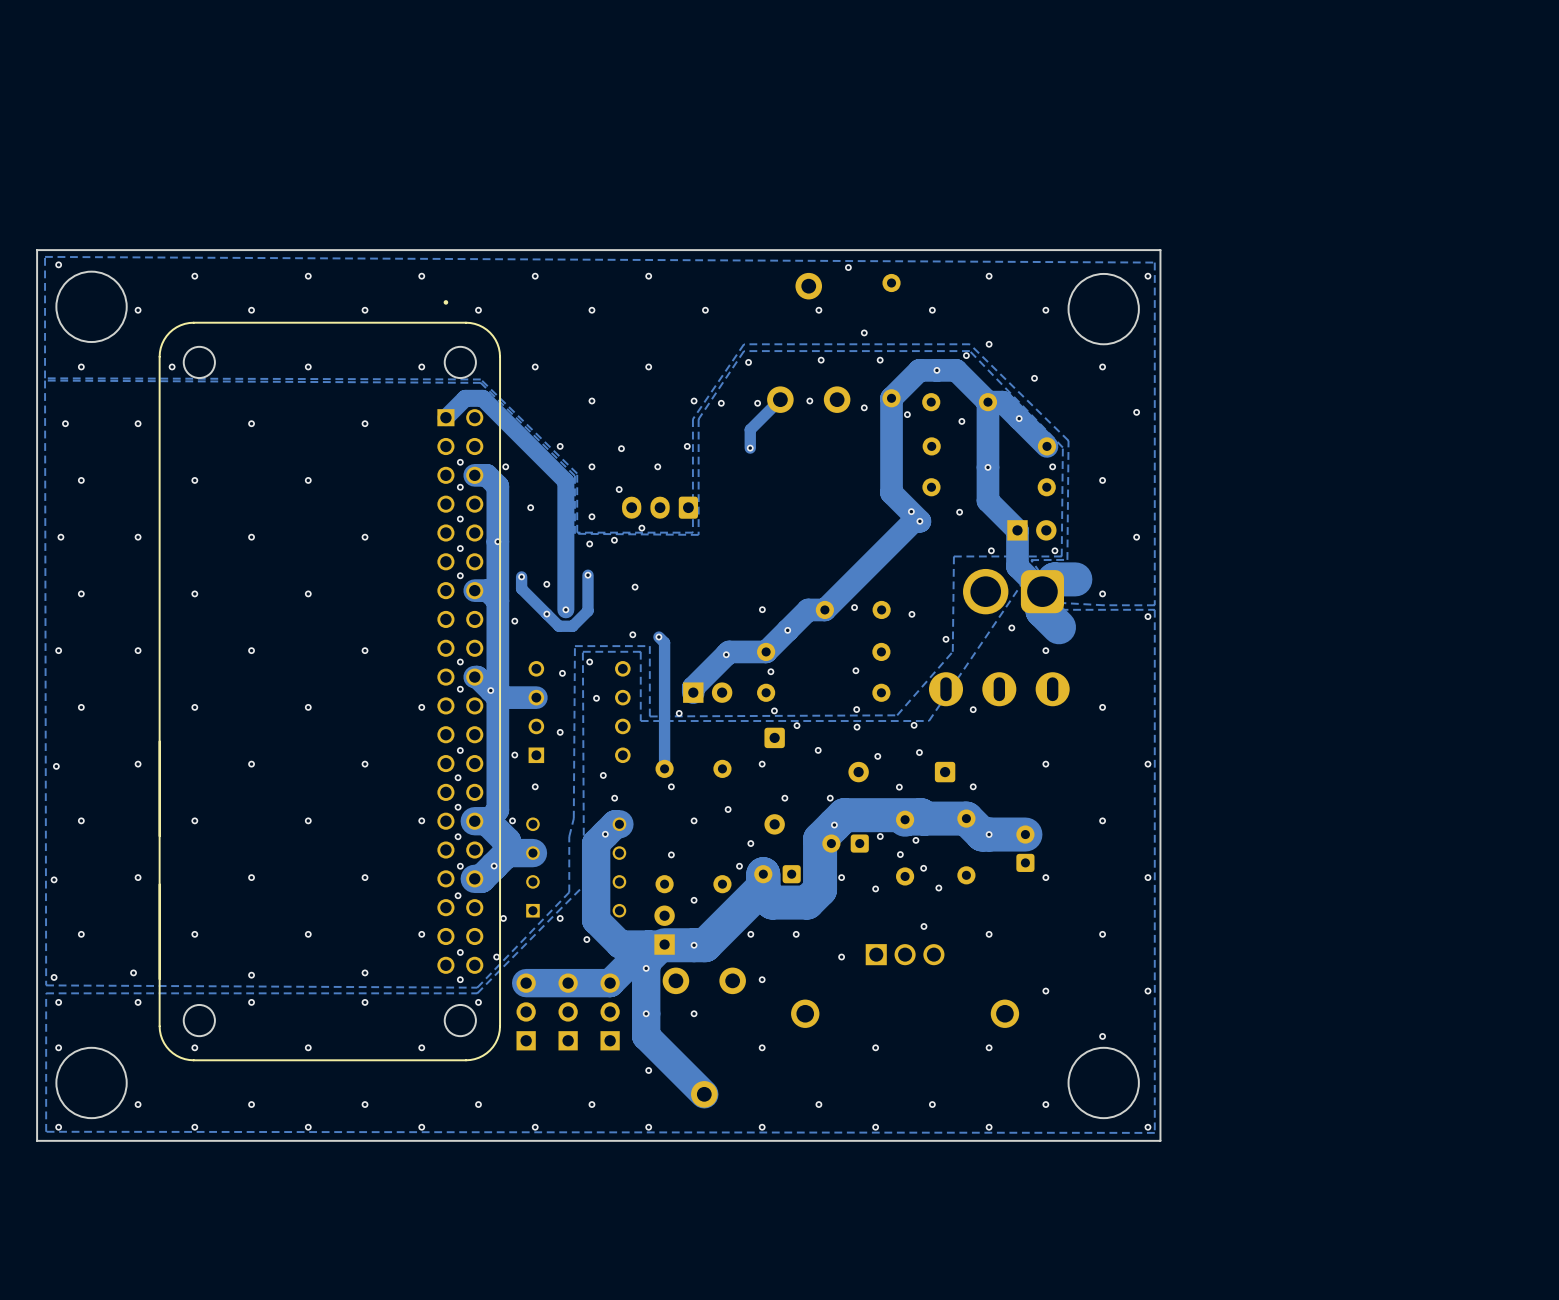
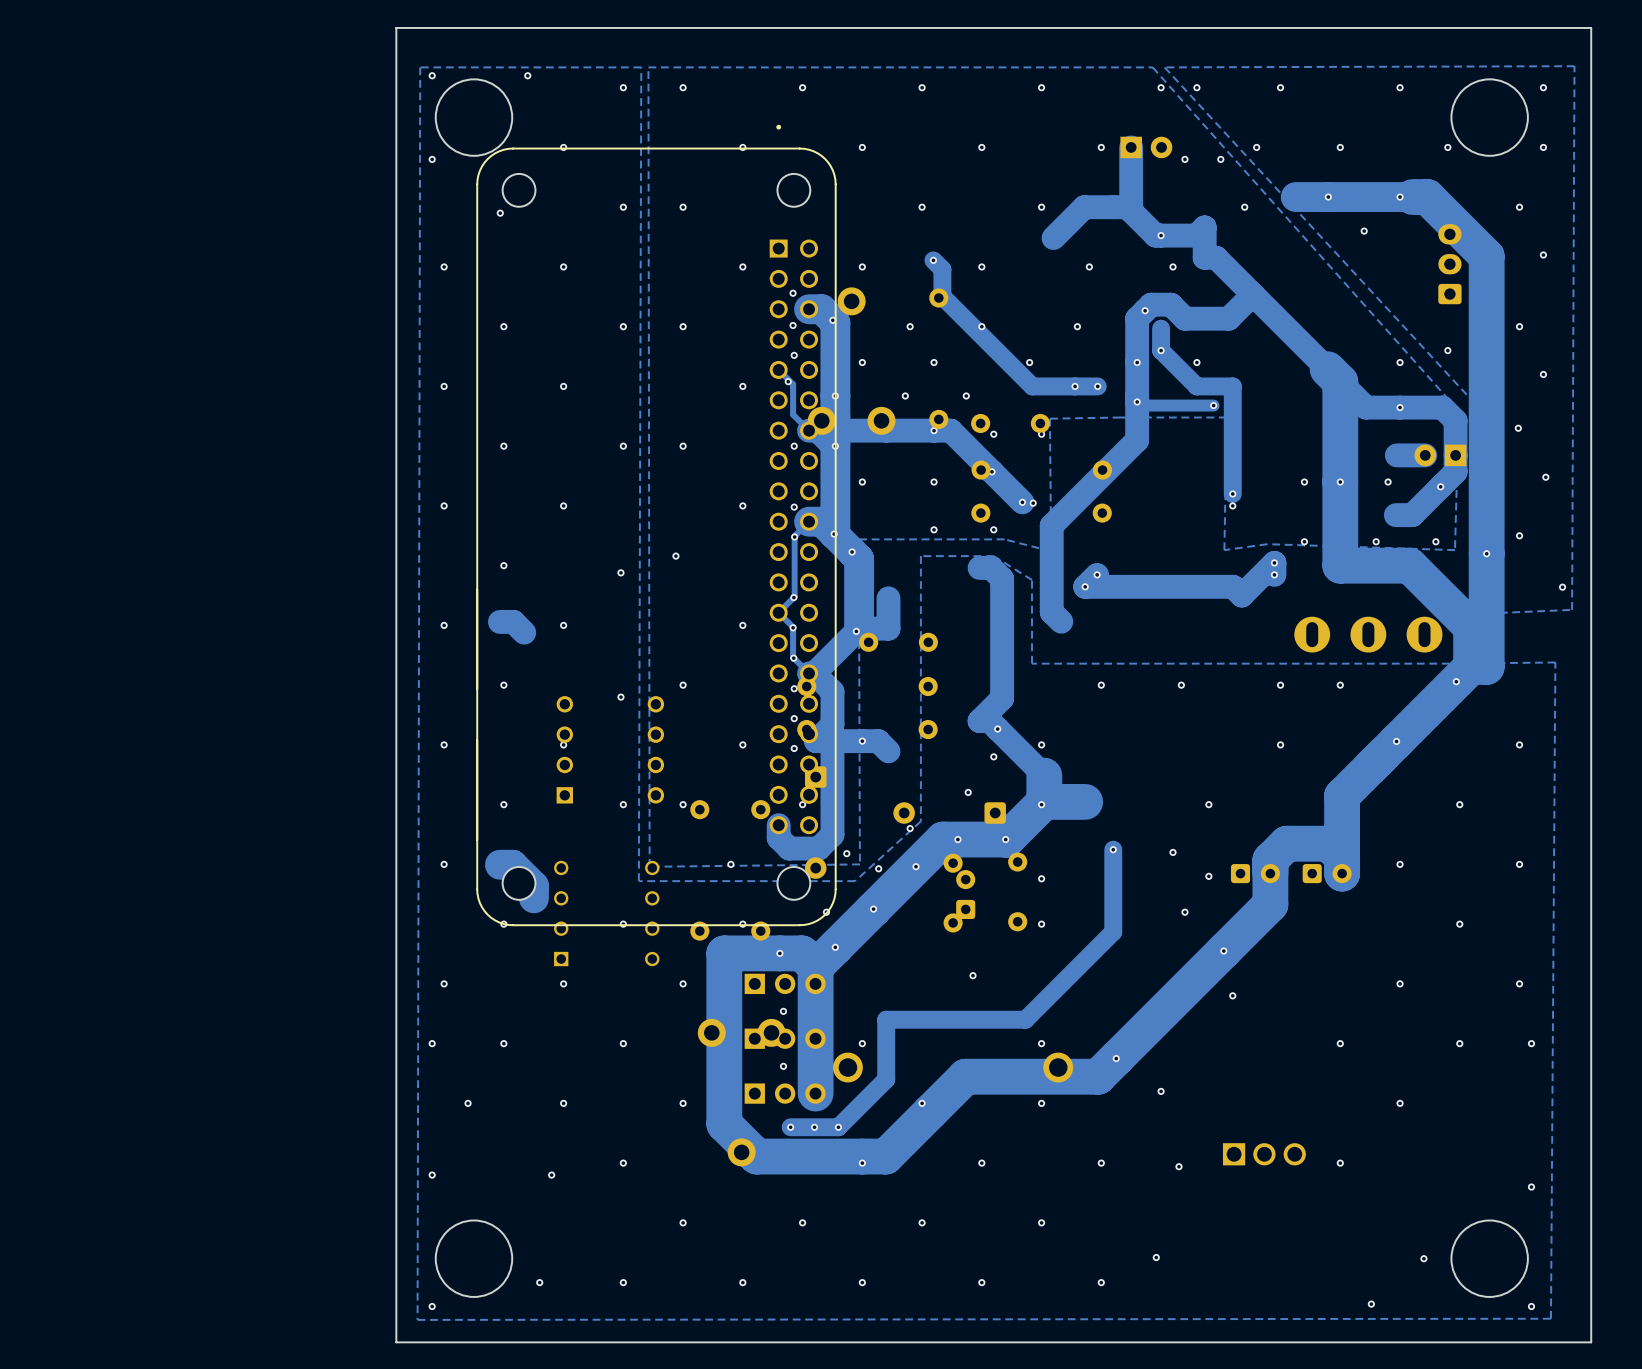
board edge: none -> (1591, 27) (396, 27) (396, 1342) (1591, 1342) (1591, 27)
zone outline: none -> (1574, 66) (1572, 609) (1487, 613) (1486, 416) (1164, 67) (1574, 66)
zone outline: none -> (1152, 67) (648, 67) (649, 866) (859, 864) (859, 628) (850, 539) (1004, 539) (1051, 551) (1049, 418) (1226, 417) (1224, 550) (1267, 544) (1455, 550) (1458, 415) (1445, 395) (1152, 67)
via: none -> (432, 75)
via: none -> (527, 75)
round board edge: none -> [435, 79, 513, 157]
round board edge: none -> [1451, 79, 1529, 157]
via: none -> (623, 87)
via: none -> (683, 87)
via: none -> (802, 87)
via: none -> (922, 87)
via: none -> (1041, 87)
via: none -> (1161, 87)
via: none -> (1196, 87)
via: none -> (1280, 87)
via: none -> (1400, 87)
via: none -> (1543, 87)
via: none -> (563, 147)
via: none -> (742, 147)
via: none -> (862, 147)
via: none -> (981, 147)
via: none -> (1101, 147)
track: none -> (1131, 147) (1131, 211) (1155, 235) (1196, 235) (1204, 227) (1204, 257) (1216, 257) (1365, 407) (1442, 407) (1455, 420) (1455, 471) (1412, 515) (1395, 515)
part: none -> (1146, 147)
via: none -> (1256, 147)
via: none -> (1340, 147)
via: none -> (1447, 147)
via: none -> (1543, 147)
via: none -> (432, 159)
via: none -> (1184, 159)
via: none -> (1220, 159)
track: none -> (1295, 197) (1427, 197) (1486, 256) (1486, 666) (1471, 666)
via: none -> (1328, 197)
via: none -> (1400, 197)
via: none -> (623, 207)
via: none -> (683, 207)
via: none -> (922, 207)
via: none -> (1041, 207)
track: none -> (1131, 207) (1084, 207) (1053, 238)
via: none -> (1244, 207)
via: none -> (1519, 207)
via: none -> (500, 213)
via: none -> (1364, 231)
via: none -> (1161, 235)
via: none -> (1543, 255)
track: none -> (933, 260) (942, 269) (942, 296) (1032, 386) (1097, 386)
via: none -> (933, 260)
board edge: (1160, 250) (37, 250) (37, 1140) (1160, 1140) (1160, 250) -> none
part: none -> (1449, 264)
via: none -> (742, 266)
via: none -> (862, 266)
via: none -> (981, 266)
via: none -> (1089, 266)
via: none -> (1173, 266)
zone outline: (45, 256) (45, 378) (480, 379) (577, 473) (577, 532) (692, 532) (692, 419) (744, 344) (969, 344) (1068, 440) (1067, 559) (1031, 560) (1061, 602) (1154, 605) (1154, 262) (45, 256) -> none
via: (58, 264) -> none
via: (848, 267) -> none
round board edge: [56, 271, 128, 343] -> none
round board edge: [1068, 273, 1140, 345] -> none
via: (194, 276) -> none
via: (308, 276) -> none
via position: (421, 276) -> (444, 266)
via position: (535, 276) -> (563, 266)
via: (648, 276) -> none
via: (989, 276) -> none
via: (1147, 276) -> none
via: none -> (793, 293)
track: none -> (1252, 294) (1228, 318) (1184, 318) (1170, 304) (1151, 304) (1137, 318) (1137, 440) (1051, 525) (1051, 612) (1061, 621)
track: none -> (809, 309) (821, 309) (835, 322) (835, 417) (821, 430) (835, 444) (834, 534)
via: none -> (1145, 310)
via: none -> (832, 320)
via: none -> (793, 325)
via: (138, 310) -> none
via: (251, 310) -> none
via: (365, 310) -> none
via: none -> (683, 326)
via: (705, 310) -> none
via: (818, 310) -> none
via: none -> (910, 326)
via: none -> (1077, 326)
via: (1045, 310) -> none
via: none -> (1519, 326)
track: none -> (1161, 328) (1161, 350) (1196, 386) (1232, 386) (1232, 493)
via: (864, 332) -> none
via: none -> (1161, 350)
via: none -> (1447, 350)
via: none -> (794, 355)
via: none -> (862, 362)
via: none -> (934, 362)
via: none -> (1029, 362)
via: (989, 344) -> none
via: none -> (1137, 362)
via: none -> (1196, 362)
via: none -> (1400, 362)
track: none -> (1327, 369) (1340, 381) (1340, 565) (1409, 565) (1471, 627) (1471, 666)
track: none -> (778, 369) (793, 384) (793, 414) (809, 430) (950, 430) (1022, 502)
zone outline: (969, 351) (1062, 447) (1061, 556) (953, 556) (952, 651) (897, 715) (649, 716) (649, 646) (574, 646) (573, 818) (569, 836) (569, 892) (477, 987) (46, 985) (45, 380) (480, 382) (574, 475) (574, 533) (698, 534) (698, 419) (744, 351) (969, 351) -> none
via: (966, 355) -> none
via: none -> (1543, 374)
via: (821, 360) -> none
via: (880, 360) -> none
via: (81, 366) -> none
via: (172, 366) -> none
via: (308, 366) -> none
via: (648, 366) -> none
via: none -> (742, 386)
via: none -> (1075, 386)
via: none -> (1097, 386)
via: (1102, 366) -> none
via: (936, 370) -> none
via: none -> (835, 395)
via: none -> (905, 395)
via: none -> (966, 395)
track: none -> (1137, 395) (1146, 405) (1213, 405)
via: (1034, 378) -> none
via: none -> (1137, 401)
via: none -> (1213, 405)
via: none -> (1400, 407)
track: (780, 399) (750, 429) (750, 448) -> none
via: (591, 401) -> none
via: (694, 401) -> none
via: (809, 401) -> none
track: (987, 402) (987, 500) (1017, 530) (1017, 566) (1042, 591) -> none
track: (987, 402) (1002, 402) (1046, 446) -> none
track: (987, 402) (956, 370) (919, 370) (891, 398) (891, 492) (919, 521) (913, 521) (824, 609) (808, 609) (766, 651) (729, 651) (693, 687) (693, 692) -> none
via: (721, 403) -> none
via: (757, 403) -> none
via: none -> (1518, 428)
via: (864, 407) -> none
via: none -> (934, 430)
via: none -> (993, 434)
via: none -> (1041, 434)
via: (1136, 412) -> none
via: (907, 414) -> none
track: (445, 417) (465, 398) (482, 398) (565, 481) (565, 609) -> none
via: (1019, 418) -> none
via: (961, 421) -> none
via: (65, 423) -> none
via: (138, 423) -> none
via: (251, 423) -> none
via: (365, 423) -> none
via: none -> (503, 446)
via: none -> (623, 446)
via: none -> (683, 446)
via: none -> (794, 446)
via: none -> (835, 446)
track: none -> (1425, 455) (1396, 455)
part: none -> (1440, 455)
via: (560, 446) -> none
via: (687, 446) -> none
via: (621, 448) -> none
via: (750, 448) -> none
via: none -> (991, 471)
via: none -> (1545, 477)
via: none -> (862, 482)
via: none -> (934, 482)
via: none -> (1304, 482)
via: none -> (1340, 482)
via: none -> (1388, 482)
via: (460, 462) -> none
via: none -> (1440, 486)
via: (505, 466) -> none
via: (591, 466) -> none
via: (657, 466) -> none
via: (1052, 466) -> none
via: (987, 467) -> none
via: none -> (1232, 493)
track: (474, 475) (486, 475) (497, 486) (497, 810) (486, 821) -> none
via: none -> (1022, 502)
via: none -> (1033, 503)
via: (81, 480) -> none
via: (194, 480) -> none
via: (308, 480) -> none
via: none -> (444, 505)
via: none -> (563, 505)
via: none -> (742, 505)
via: (1102, 480) -> none
via: none -> (1232, 505)
via: none -> (794, 507)
via: (460, 487) -> none
via: (619, 489) -> none
part: none -> (656, 525)
via: none -> (934, 529)
via: none -> (993, 529)
via: (530, 507) -> none
part: (660, 507) -> none
via: none -> (834, 534)
via: none -> (1519, 535)
via: none -> (794, 536)
via: (911, 511) -> none
via: (959, 512) -> none
via: none -> (1304, 541)
via: none -> (1376, 541)
via: none -> (1435, 541)
via: (591, 516) -> none
via: (460, 519) -> none
via: (919, 521) -> none
via: none -> (852, 552)
via: none -> (1486, 553)
part: (1031, 530) -> none
via: none -> (1274, 562)
via: (60, 537) -> none
via: (138, 537) -> none
via: (251, 537) -> none
via: (365, 537) -> none
via: none -> (503, 565)
via: (1136, 537) -> none
track: none -> (979, 567) (991, 567) (1002, 578) (1002, 698) (979, 721) (989, 721) (1044, 775) (1044, 801)
via: (614, 540) -> none
via: (497, 541) -> none
via: none -> (1097, 574)
track: none -> (1274, 574) (1274, 562) (1241, 595) (1233, 586) (1085, 586) (1097, 574)
via: none -> (1274, 574)
via: (460, 548) -> none
via: (991, 550) -> none
via: (1054, 550) -> none
via: none -> (1085, 586)
via: none -> (1562, 587)
via: none -> (793, 597)
track: none -> (888, 598) (888, 628) (859, 628)
via: (460, 575) -> none
track: (587, 575) (587, 610) (572, 626) (559, 626) (521, 588) (521, 576) -> none
via: (587, 575) -> none
via: (521, 576) -> none
track: (1075, 579) (1054, 579) (1042, 591) -> none
zone outline: (1022, 583) (928, 721) (640, 721) (640, 651) (582, 651) (584, 885) (477, 993) (46, 993) (46, 1131) (1154, 1132) (1154, 609) (1060, 609) (1022, 583) -> none
via: (546, 584) -> none
via: (635, 587) -> none
part: (1013, 591) -> none
track: (1042, 591) (1042, 610) (1059, 627) -> none
via: (81, 593) -> none
via: (194, 593) -> none
via: (308, 593) -> none
via: none -> (444, 625)
via: none -> (563, 625)
via: none -> (742, 625)
via: (1102, 593) -> none
via: none -> (793, 627)
track: none -> (859, 628) (814, 673)
track: none -> (859, 628) (859, 559) (821, 521) (809, 521) (794, 536) (794, 596) (778, 612) (793, 627) (793, 657) (809, 673) (814, 673)
via: none -> (856, 631)
part: none -> (1368, 634)
via: (854, 607) -> none
via: (565, 609) -> none
via: (762, 609) -> none
via: (546, 614) -> none
via: (911, 614) -> none
via: (1147, 616) -> none
via: (514, 621) -> none
via: none -> (793, 658)
via: (1011, 627) -> none
via: (787, 630) -> none
zone outline: none -> (1462, 663) (1032, 663) (1032, 580) (993, 556) (920, 556) (920, 821) (855, 881) (638, 881) (641, 67) (420, 67) (417, 1319) (1550, 1318) (1555, 662) (1452, 663)
track: none -> (1471, 666) (1342, 795) (1342, 873)
via: (632, 634) -> none
track: (658, 637) (664, 642) (664, 768) -> none
via: (658, 637) -> none
track: none -> (814, 673) (832, 691) (832, 724) (816, 741) (878, 741) (888, 751)
via: (945, 639) -> none
via: none -> (1456, 681)
via: (58, 650) -> none
via: (138, 650) -> none
via: (251, 650) -> none
via: (365, 650) -> none
via: none -> (503, 685)
via: none -> (683, 685)
via: none -> (1181, 685)
via: none -> (1280, 685)
via: none -> (1340, 685)
via: (726, 654) -> none
via: none -> (794, 688)
via: (460, 662) -> none
via: (855, 670) -> none
via: (770, 671) -> none
via: (562, 673) -> none
track: (474, 677) (477, 677) (497, 697) (536, 697) -> none
part: (329, 680) -> none
via: none -> (794, 718)
via: (460, 689) -> none
part: (999, 689) -> none
via: (490, 690) -> none
part: (707, 692) -> none
via: none -> (997, 729)
via: (596, 698) -> none
track: none -> (832, 741) (832, 834) (818, 848) (789, 848) (778, 837) (778, 825)
via: none -> (862, 741)
via: none -> (1396, 741)
via: (81, 707) -> none
via: (194, 707) -> none
via: (308, 707) -> none
via: none -> (563, 744)
via: none -> (1041, 744)
via: (1102, 707) -> none
via: none -> (1280, 744)
via: none -> (1519, 744)
via: (856, 709) -> none
via: (973, 709) -> none
via: none -> (794, 748)
via: (774, 710) -> none
via position: (679, 713) -> (742, 744)
via: none -> (993, 756)
via: (797, 725) -> none
via: (914, 725) -> none
via: (857, 727) -> none
via: (560, 732) -> none
via: (460, 750) -> none
via: (818, 750) -> none
via: (514, 755) -> none
via: (877, 756) -> none
track: none -> (1044, 801) (1006, 839) (943, 839) (815, 967)
track: none -> (1085, 801) (1044, 801)
via: (138, 764) -> none
via: (251, 764) -> none
via: (365, 764) -> none
via: none -> (503, 804)
via: none -> (683, 804)
via: none -> (1041, 804)
via: (1045, 764) -> none
via: none -> (1459, 804)
via: (56, 766) -> none
via position: (603, 775) -> (623, 804)
via: (458, 777) -> none
via: (535, 786) -> none
via: (671, 786) -> none
via: none -> (910, 828)
via: (973, 786) -> none
via position: (899, 787) -> (957, 839)
via: none -> (1005, 839)
via: (614, 798) -> none
via: (784, 798) -> none
via: (830, 798) -> none
track: none -> (1113, 849) (1113, 932) (1025, 1019) (886, 1019) (886, 1079) (838, 1127) (790, 1127)
via: none -> (1113, 849)
via: (458, 807) -> none
via: (728, 809) -> none
via: none -> (846, 853)
track: none -> (1342, 857) (1328, 843) (1286, 843) (1270, 860) (1270, 904) (1098, 1076) (965, 1076) (885, 1156) (756, 1156) (724, 1124) (724, 953) (801, 953) (815, 967)
track: (924, 818) (921, 815) (844, 815) (820, 839) (820, 889) (807, 902) (772, 902) (763, 893) (763, 874) -> none
track: (905, 819) (966, 818) (982, 834) (1025, 834) -> none
via: (81, 820) -> none
via: (194, 820) -> none
via: (308, 820) -> none
via: (512, 820) -> none
via position: (1102, 820) -> (1173, 852)
via: none -> (1400, 864)
via: none -> (1519, 864)
track: (619, 824) (615, 824) (596, 843) (596, 920) (620, 944) (664, 944) (646, 962) (646, 1036) (704, 1094) -> none
part: none -> (1255, 873)
part: none -> (1327, 873)
via: none -> (1208, 876)
via: (605, 834) -> none
via: (458, 836) -> none
via position: (880, 836) -> (916, 866)
via: (915, 840) -> none
via: (750, 843) -> none
part: (845, 843) -> none
part: (1025, 848) -> none
part: none -> (965, 894)
track: (532, 853) (507, 853) (481, 878) (474, 878) -> none
via: (671, 854) -> none
via: (900, 854) -> none
via: (460, 866) -> none
via: (494, 866) -> none
via: (739, 866) -> none
via: none -> (826, 912)
via: none -> (1184, 912)
via: (923, 868) -> none
part: (777, 874) -> none
via: (138, 877) -> none
via: (251, 877) -> none
via: (365, 877) -> none
via: none -> (503, 924)
via: none -> (623, 924)
via: none -> (742, 924)
via position: (841, 877) -> (873, 909)
via: none -> (1041, 924)
via: (1045, 877) -> none
via: (1147, 877) -> none
via: none -> (1459, 924)
via: (54, 879) -> none
track: (763, 887) (705, 945) (664, 945) -> none
via: (875, 888) -> none
via: (938, 888) -> none
via: (458, 895) -> none
via: none -> (835, 947)
via: (694, 900) -> none
via: none -> (1223, 951)
via: none -> (779, 953)
via: (503, 918) -> none
via: (560, 918) -> none
track: none -> (815, 967) (815, 1093)
part: (664, 930) -> none
via: (81, 934) -> none
via: (194, 934) -> none
via: (308, 934) -> none
via: none -> (563, 983)
via: none -> (683, 983)
part: none -> (785, 983)
via: (750, 934) -> none
via: (796, 934) -> none
via: (989, 934) -> none
via: (1102, 934) -> none
via: none -> (1400, 983)
via: none -> (1519, 983)
via: (586, 939) -> none
track: (648, 944) (610, 983) (526, 983) -> none
via: (694, 945) -> none
via: none -> (1232, 995)
via: (460, 952) -> none
part: (905, 954) -> none
via: (496, 957) -> none
via: (841, 957) -> none
via: none -> (783, 1011)
via: (646, 968) -> none
via: (133, 972) -> none
via: (365, 972) -> none
via: (251, 975) -> none
via: (54, 977) -> none
via: (460, 979) -> none
via: (762, 979) -> none
part: none -> (785, 1038)
via: none -> (432, 1043)
via: none -> (503, 1043)
via: none -> (623, 1043)
via: none -> (862, 1043)
via: none -> (1041, 1043)
via position: (1045, 991) -> (1116, 1058)
via: (1147, 991) -> none
via: none -> (1340, 1043)
via: none -> (1459, 1043)
via: none -> (1531, 1043)
via: (58, 1002) -> none
via: (138, 1002) -> none
via: (251, 1002) -> none
via: (365, 1002) -> none
via: (478, 1002) -> none
part: (526, 1011) -> none
part: (568, 1011) -> none
part: (610, 1011) -> none
via: none -> (783, 1066)
via: (646, 1013) -> none
via: (694, 1013) -> none
part: none -> (785, 1093)
round board edge: [56, 1047, 128, 1119] -> none
via: (58, 1047) -> none
via: (194, 1047) -> none
via: (308, 1047) -> none
via position: (421, 1047) -> (468, 1103)
via: none -> (563, 1103)
via: none -> (683, 1103)
via: (762, 1047) -> none
round board edge: [1068, 1047, 1140, 1119] -> none
via: none -> (1400, 1103)
via: (648, 1070) -> none
via: none -> (790, 1127)
via: none -> (814, 1127)
via: none -> (838, 1127)
part: none -> (1264, 1154)
via: (138, 1104) -> none
via: (251, 1104) -> none
via: (365, 1104) -> none
via: (478, 1104) -> none
via: none -> (1340, 1163)
via: (58, 1127) -> none
via: (194, 1127) -> none
via: (308, 1127) -> none
via position: (421, 1127) -> (432, 1175)
via position: (535, 1127) -> (551, 1175)
via position: (648, 1127) -> (683, 1222)
via: (762, 1127) -> none
via position: (875, 1127) -> (922, 1222)
via position: (989, 1127) -> (1041, 1222)
via position: (1147, 1127) -> (1178, 1166)
via: none -> (1531, 1187)
round board edge: none -> [435, 1220, 513, 1298]
round board edge: none -> [1451, 1220, 1529, 1298]
via: none -> (802, 1222)
via: none -> (1156, 1257)
via: none -> (1423, 1258)
via: none -> (539, 1282)
via: none -> (623, 1282)
via: none -> (742, 1282)
via: none -> (862, 1282)
via: none -> (981, 1282)
via: none -> (1101, 1282)
via: none -> (1371, 1304)
via: none -> (432, 1306)
via: none -> (1531, 1306)

